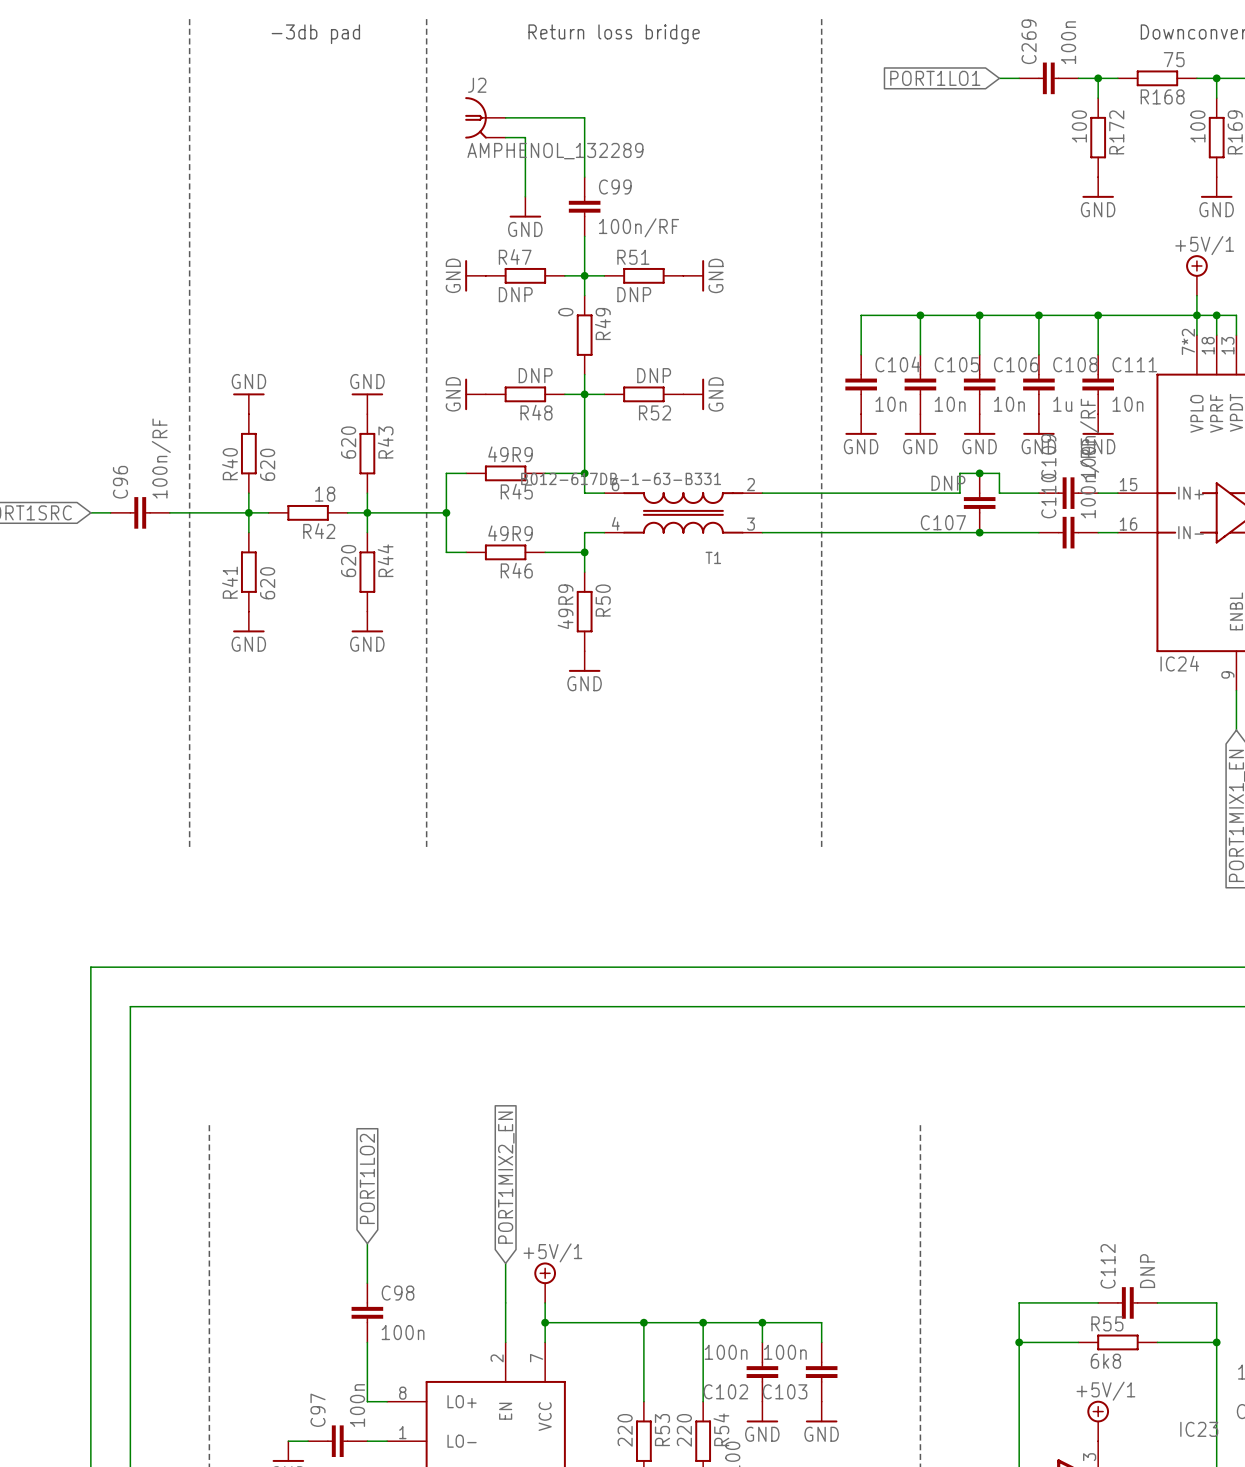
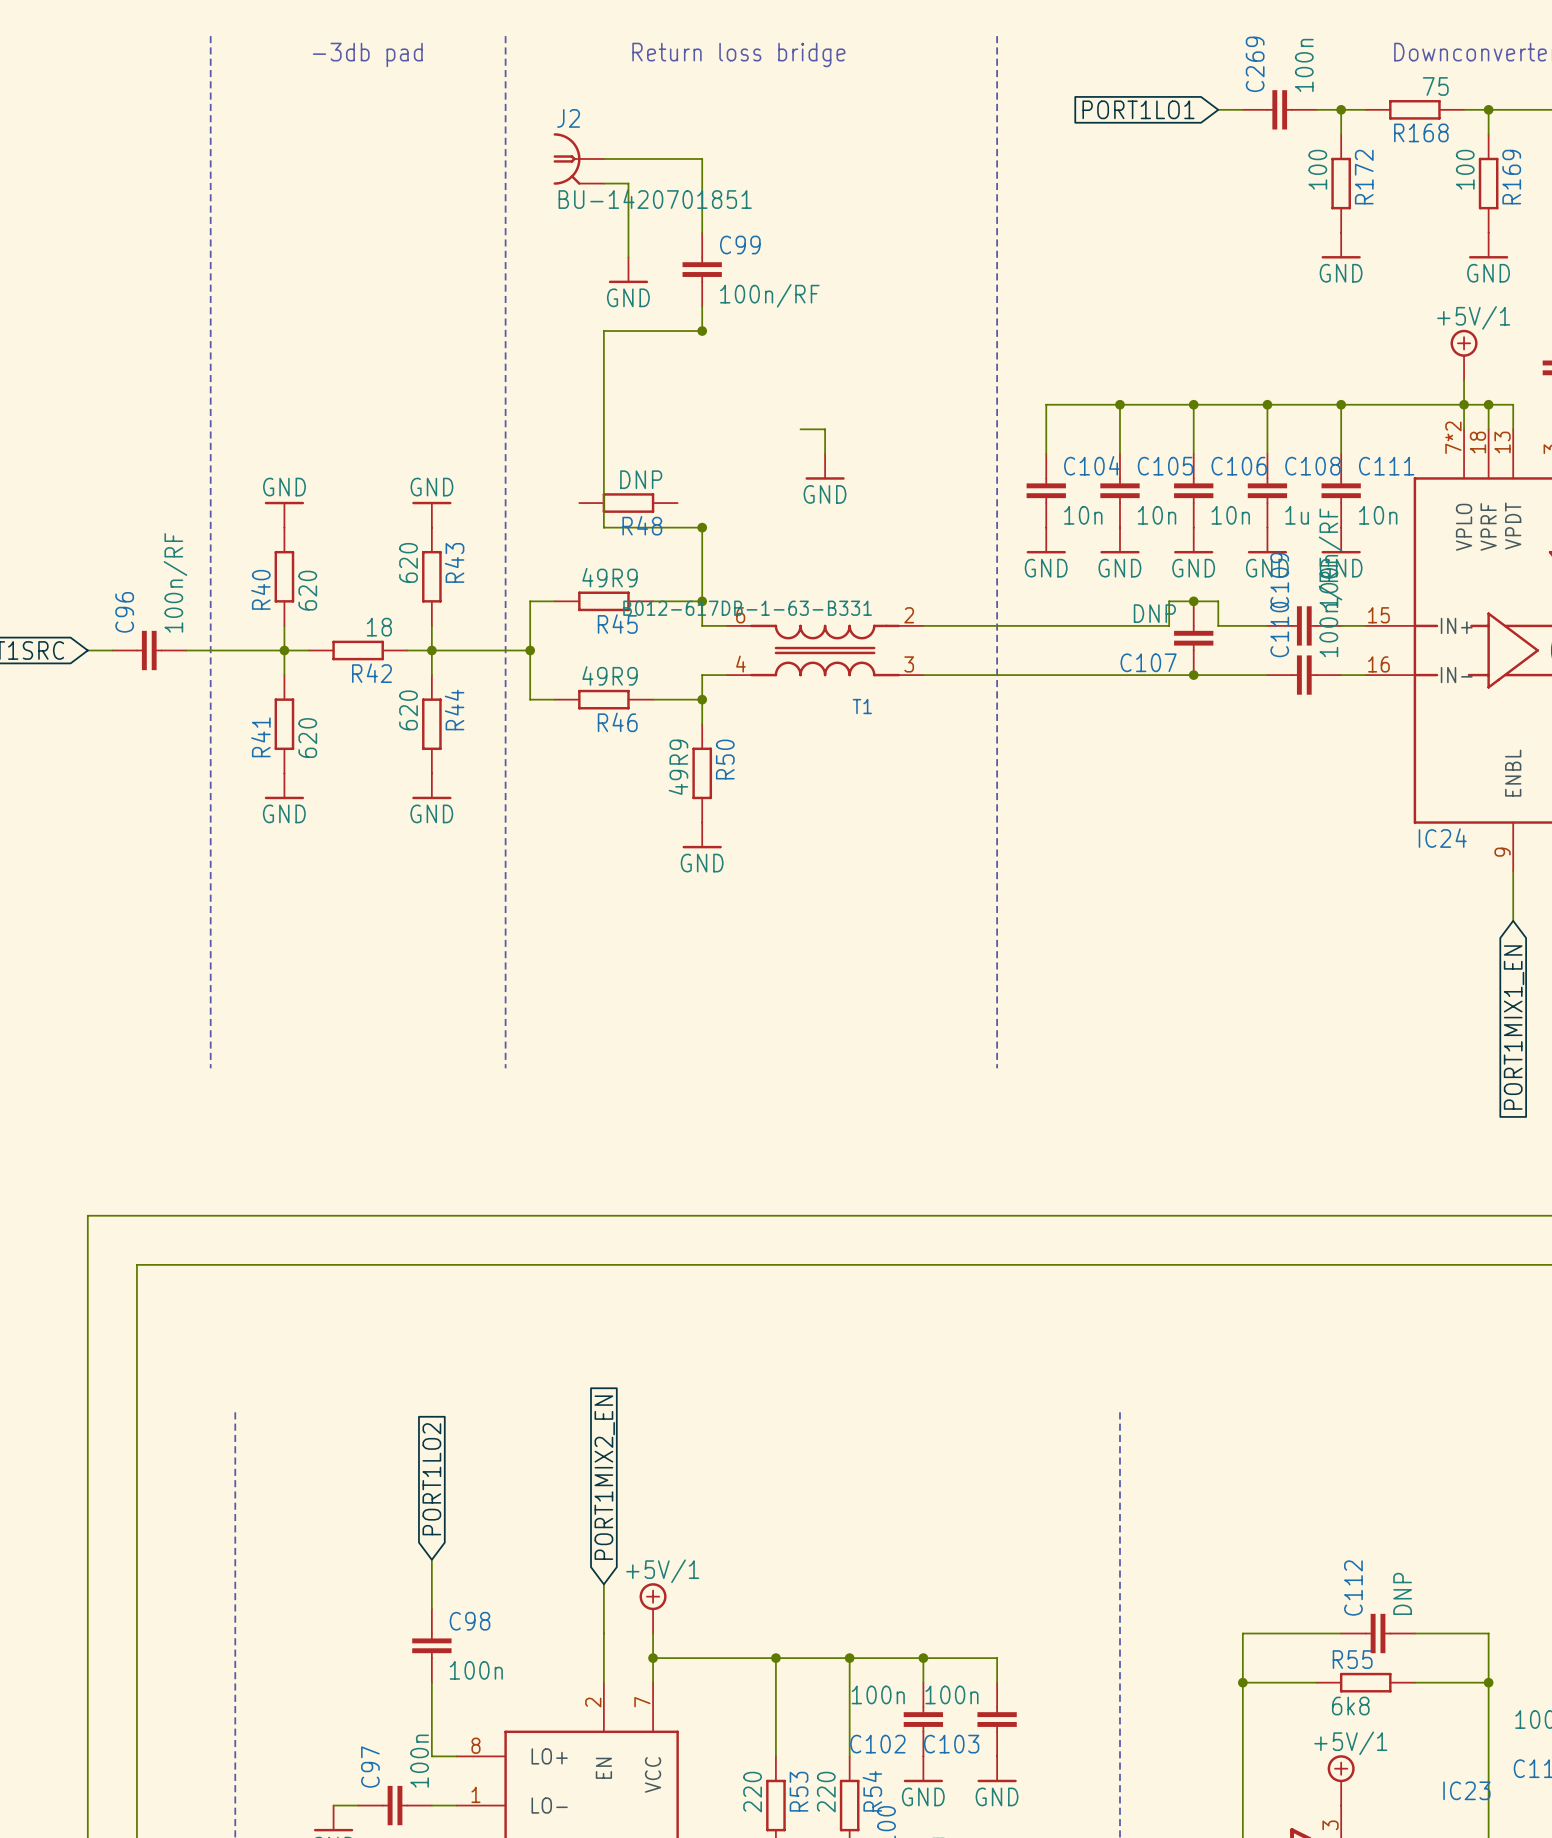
J2 value: AMPHENOL_132289 (555, 151) -> BU-1420701851 (655, 199)
wire: (584, 256) (584, 295) -> (702, 331) (603, 331) (603, 527) (702, 527)
power symbol: GND (475, 275) -> none
R47: DNP (525, 275) -> none
wire: (564, 275) (604, 275) -> none
junction position: (584, 275) -> (702, 331)
R51: DNP (643, 275) -> none
power symbol: GND (693, 275) -> none
R49: 0 (584, 335) -> none
wire: none -> (800, 429) (825, 429) (825, 453)
wire: (584, 374) (584, 414) -> none
power symbol: GND (475, 394) -> none
wire: (564, 394) (604, 394) -> none
junction position: (584, 394) -> (702, 527)
R52: DNP (643, 394) -> none
power symbol position: GND (693, 394) -> GND (825, 466)
power symbol rotation: 0° (703, 394) -> 90° clockwise (825, 478)

